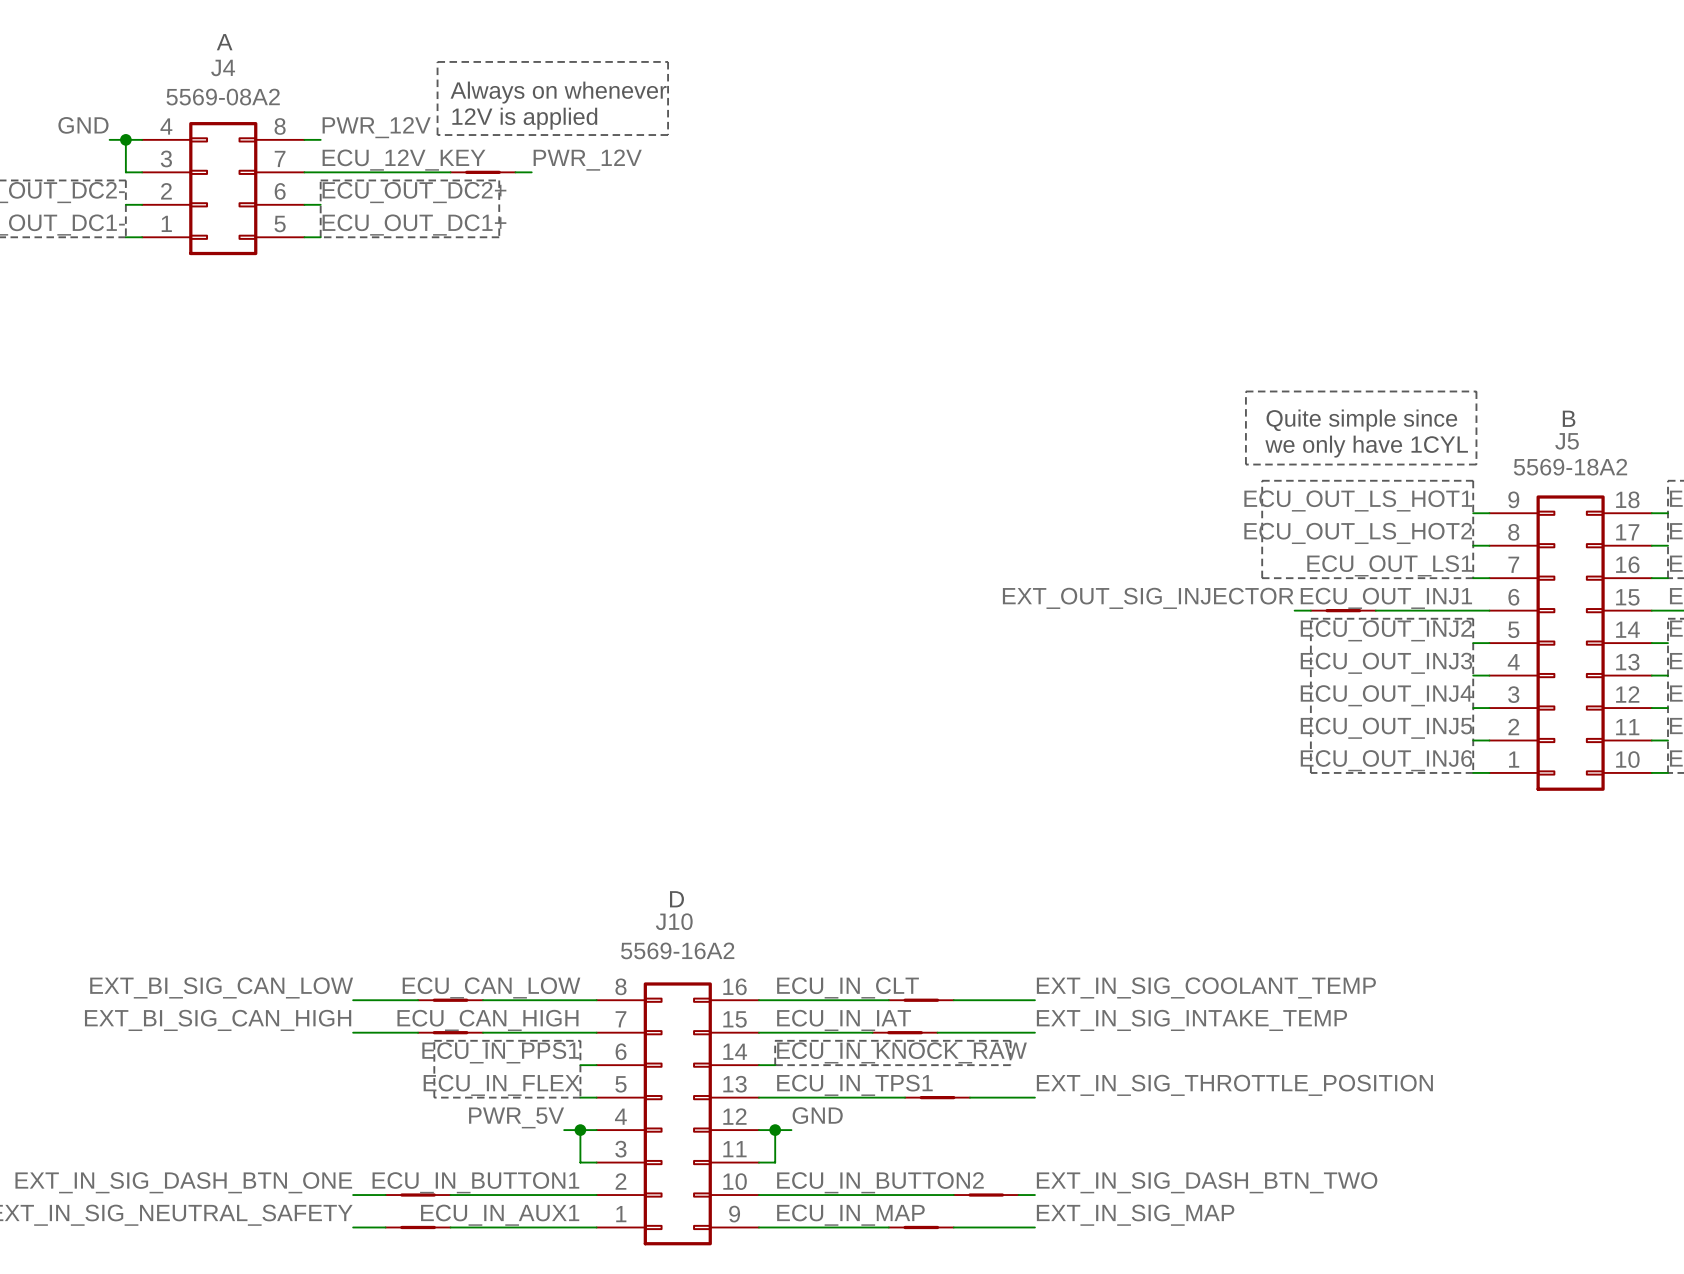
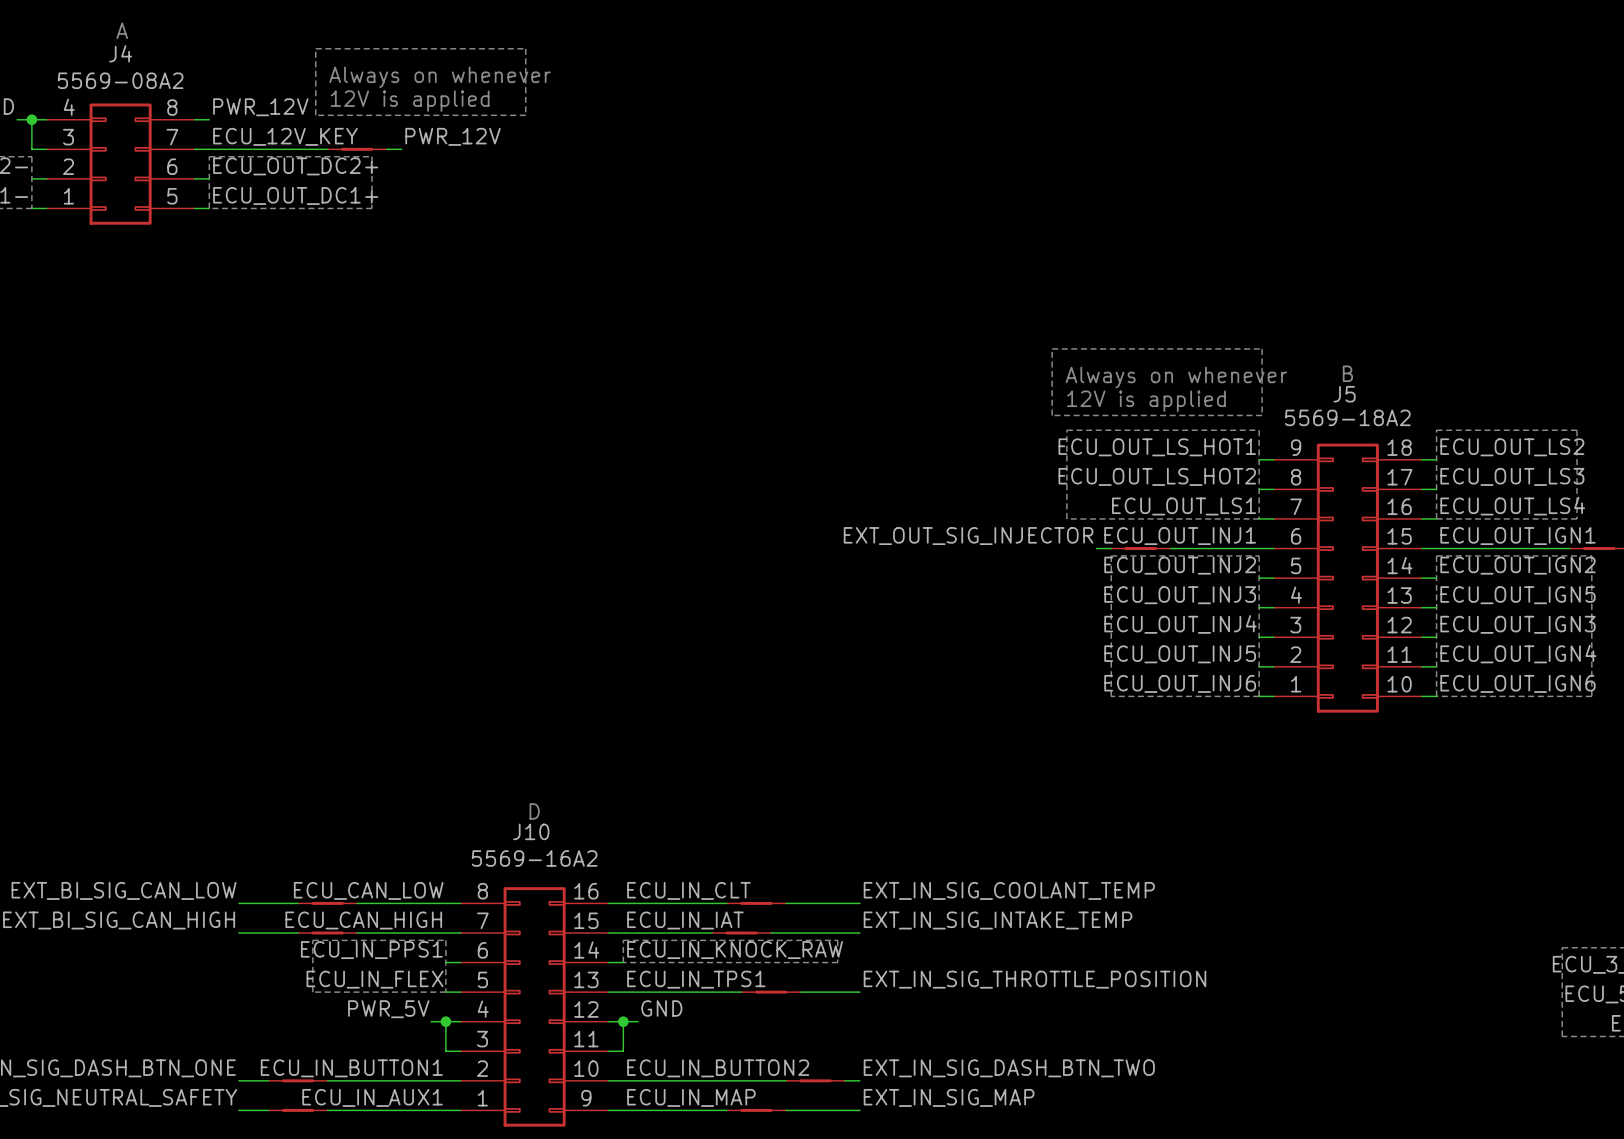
text: Quite simple since (1361, 420) -> Always on whenever (1176, 377)
text: we only have 1CYL (1366, 446) -> 12V is applied (1146, 401)

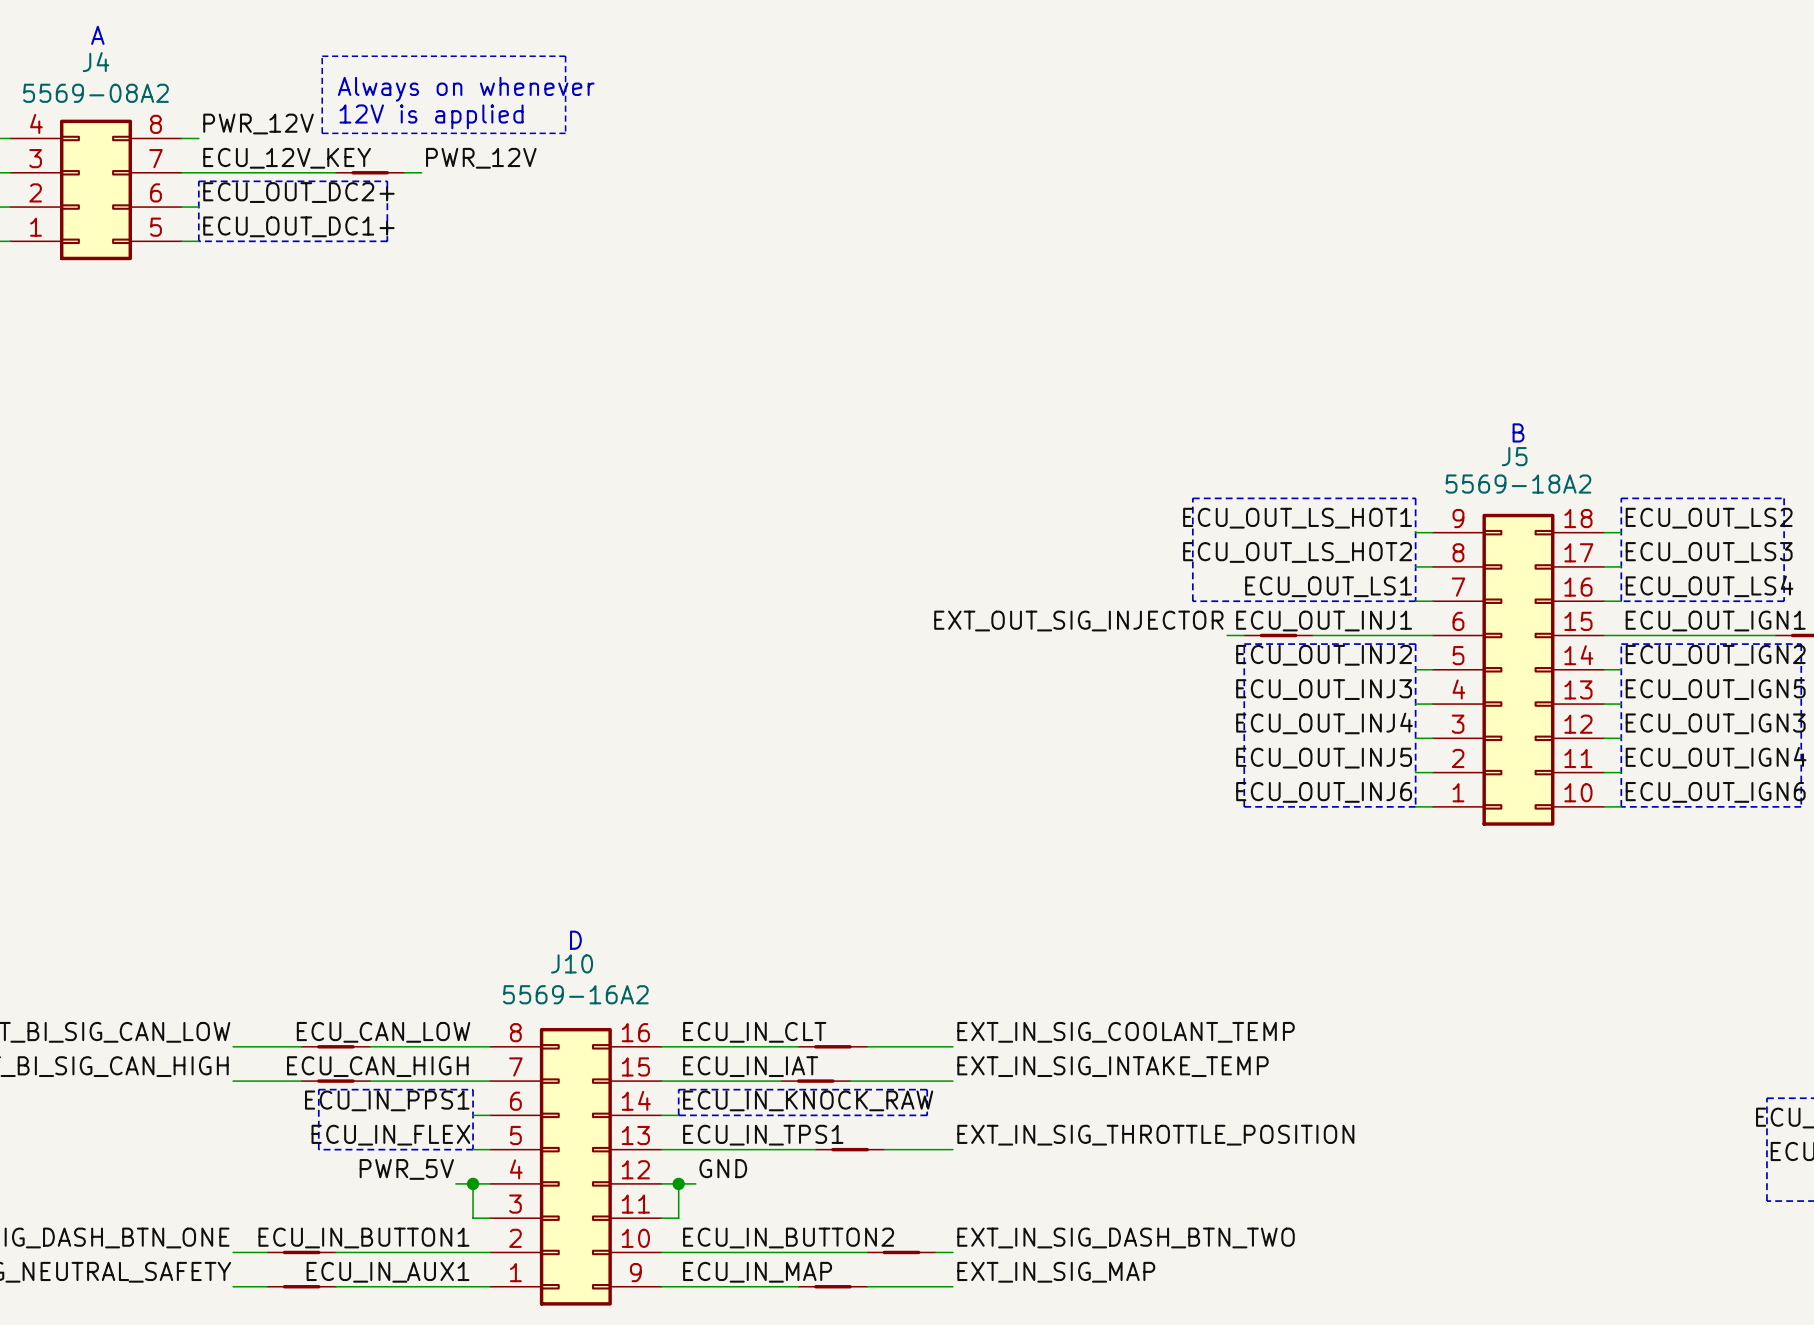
line: (1052, 348) (1262, 348) (1262, 415) (1052, 415) (1052, 348) -> none
text: Always on whenever (1176, 377) -> none
text: 12V is applied (1146, 401) -> none

